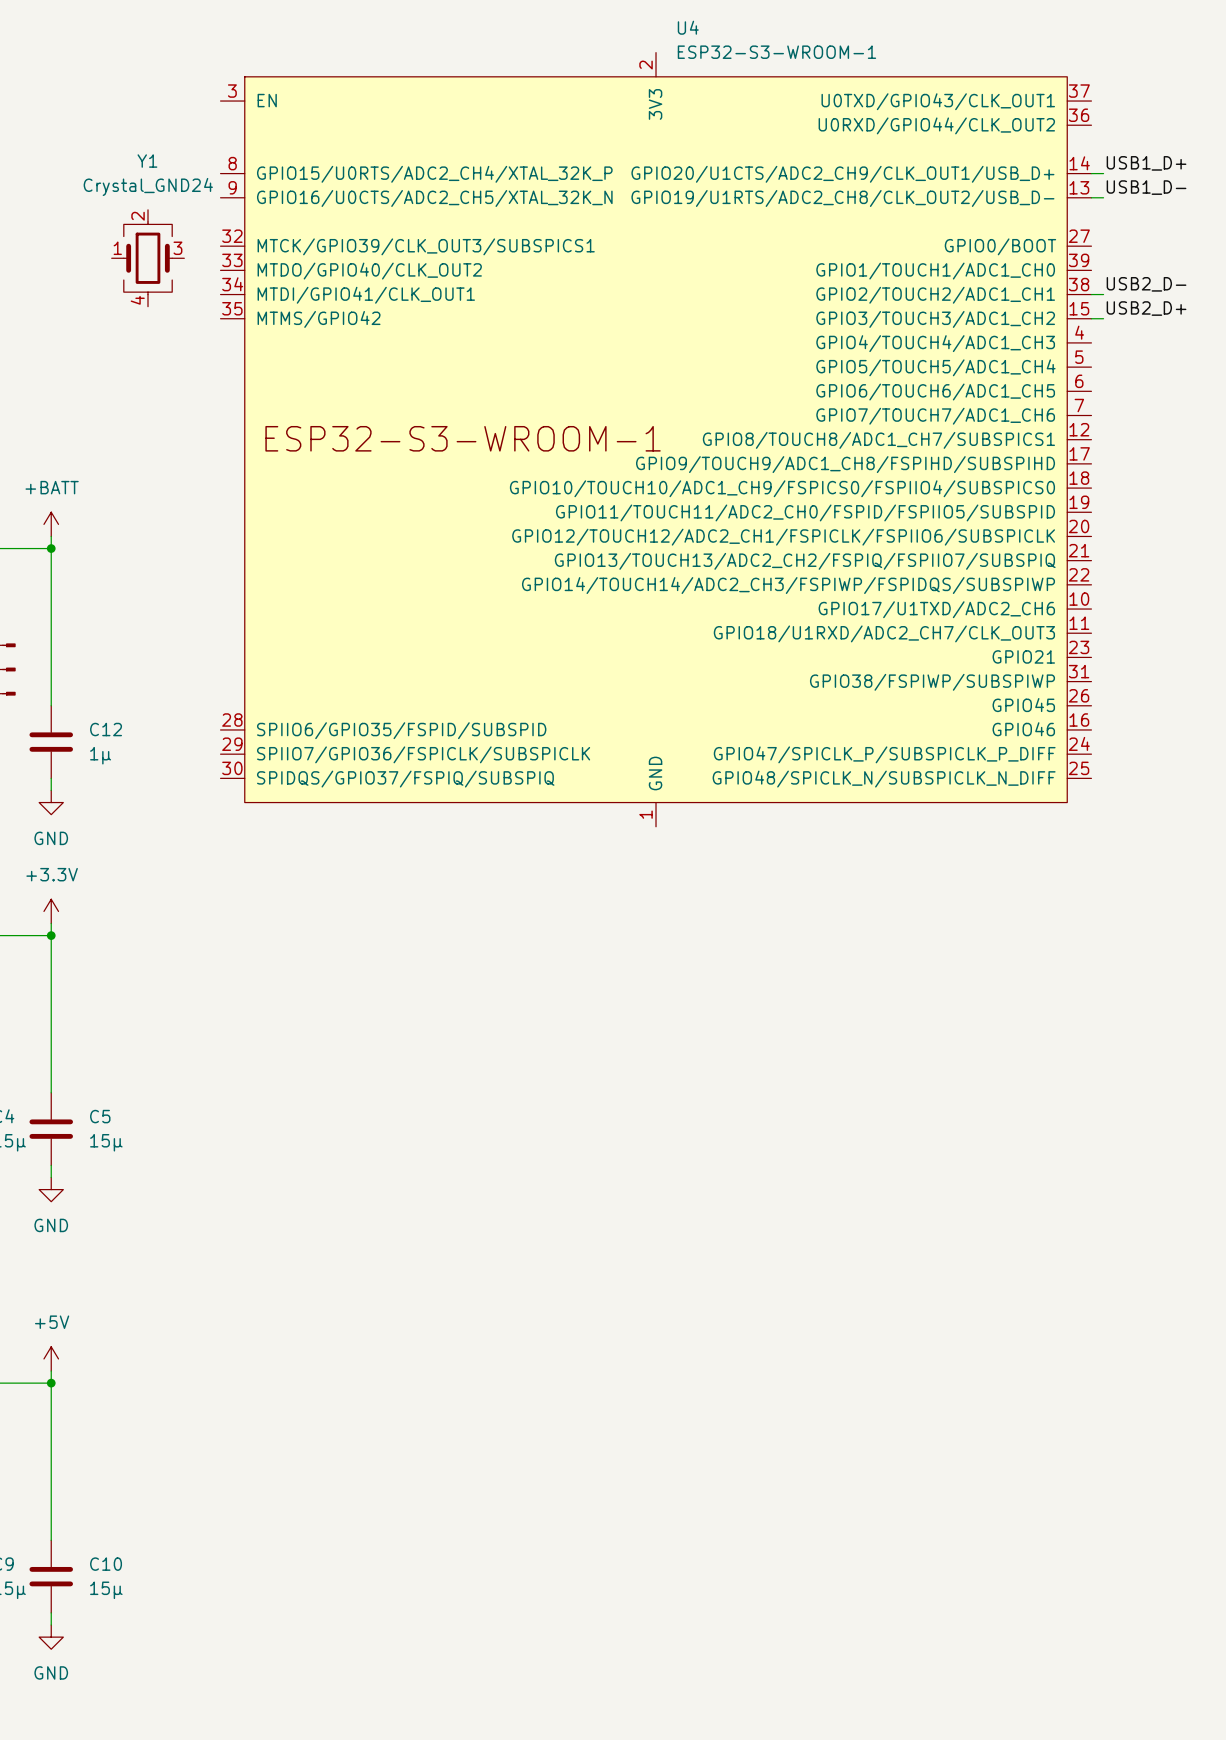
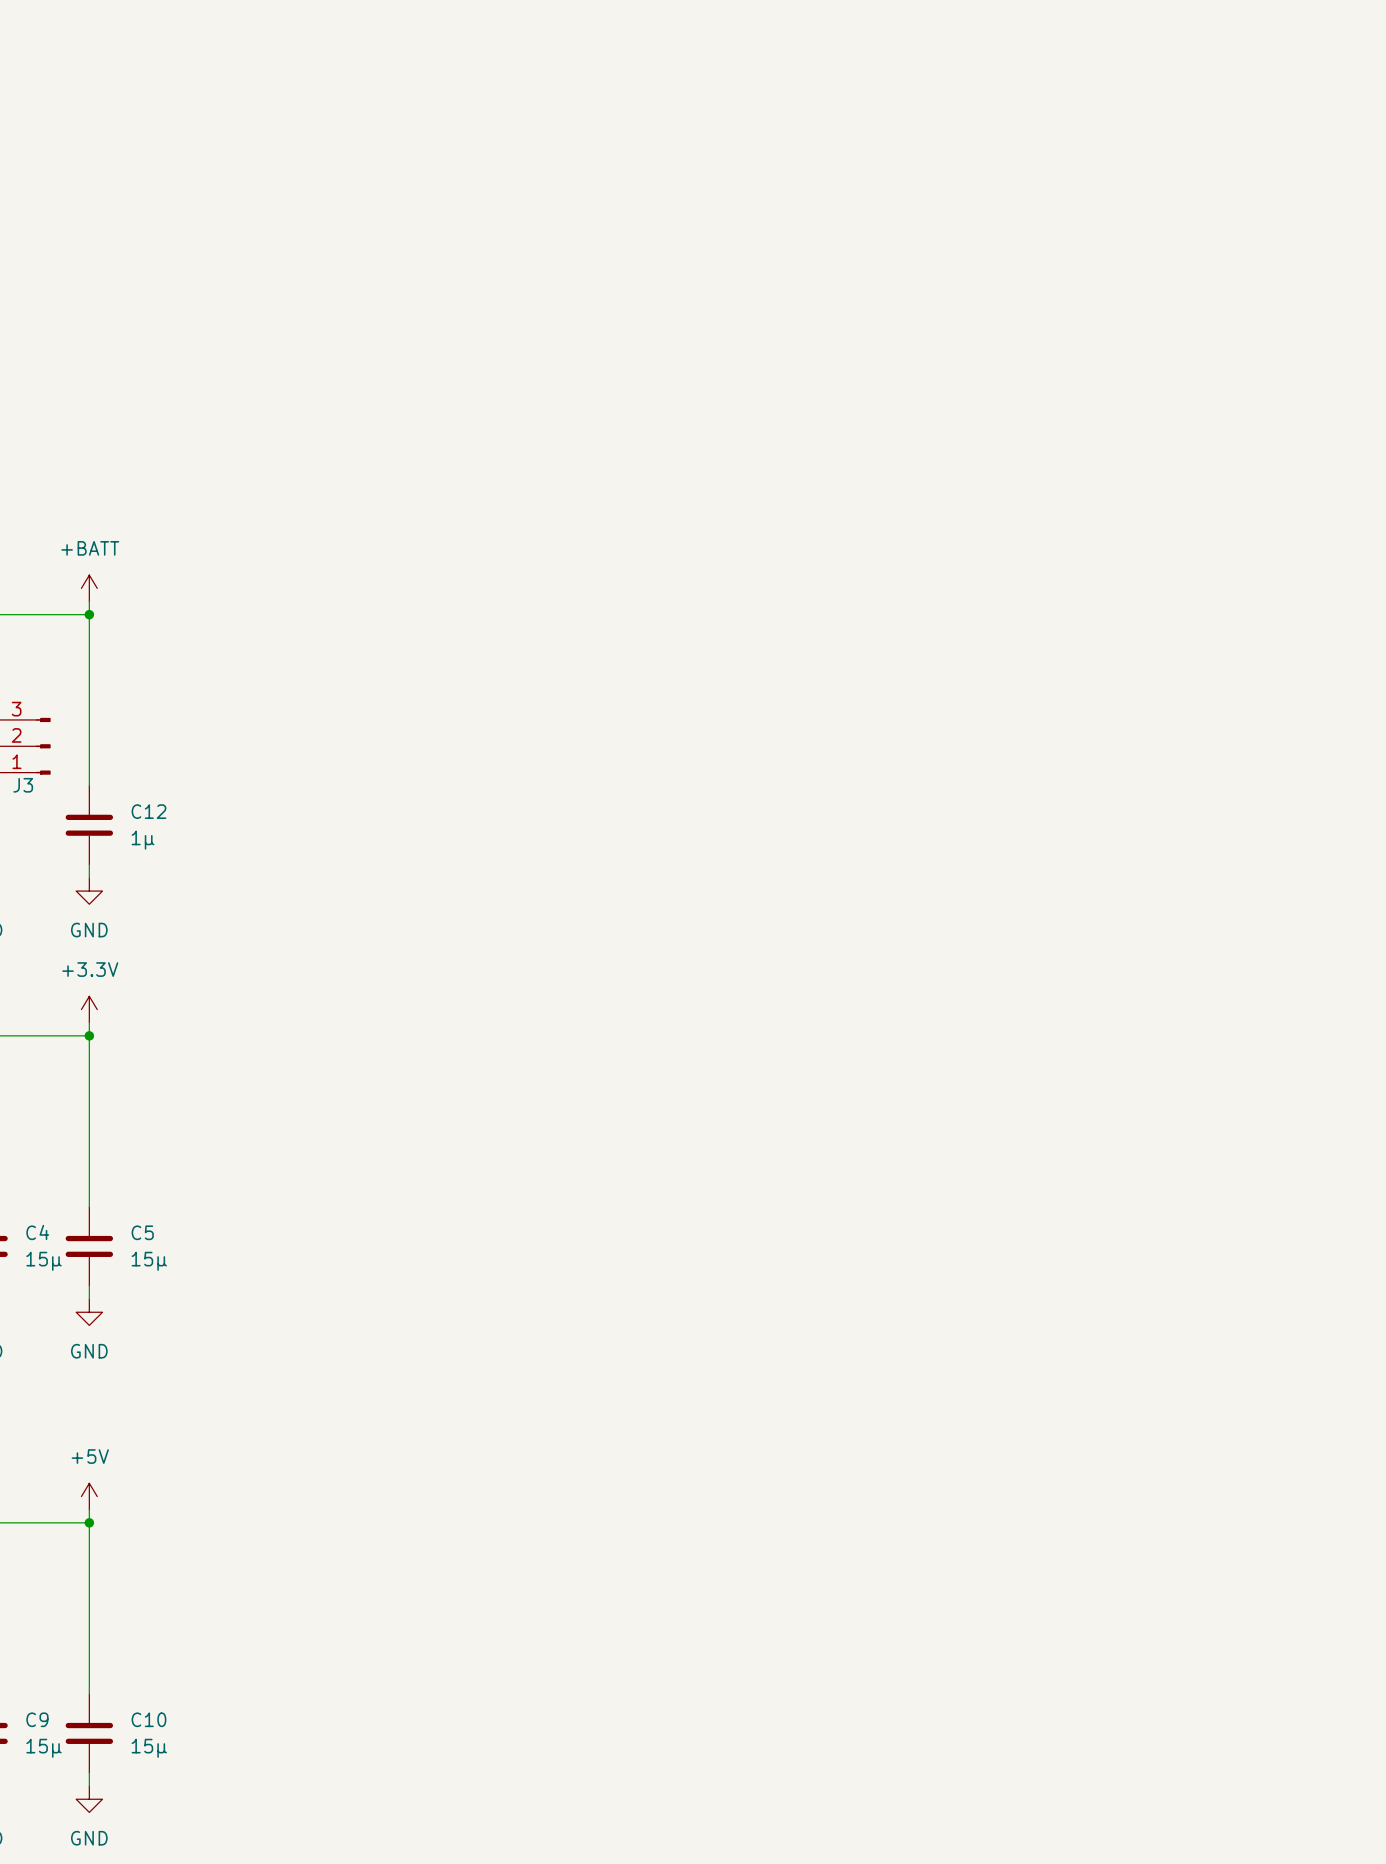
label: USB1_D+ (1146, 163) -> none
wire: (1091, 173) (1103, 173) -> none
label: USB1_D- (1146, 187) -> none
wire: (1091, 197) (1103, 197) -> none
Y1: Crystal_GND24 (148, 258) -> none
label: USB2_D- (1146, 284) -> none
wire: (1091, 294) (1103, 294) -> none
label: USB2_D+ (1146, 308) -> none
wire: (1091, 318) (1103, 318) -> none
U4: ESP32-S3-WROOM-1 (656, 439) -> none

